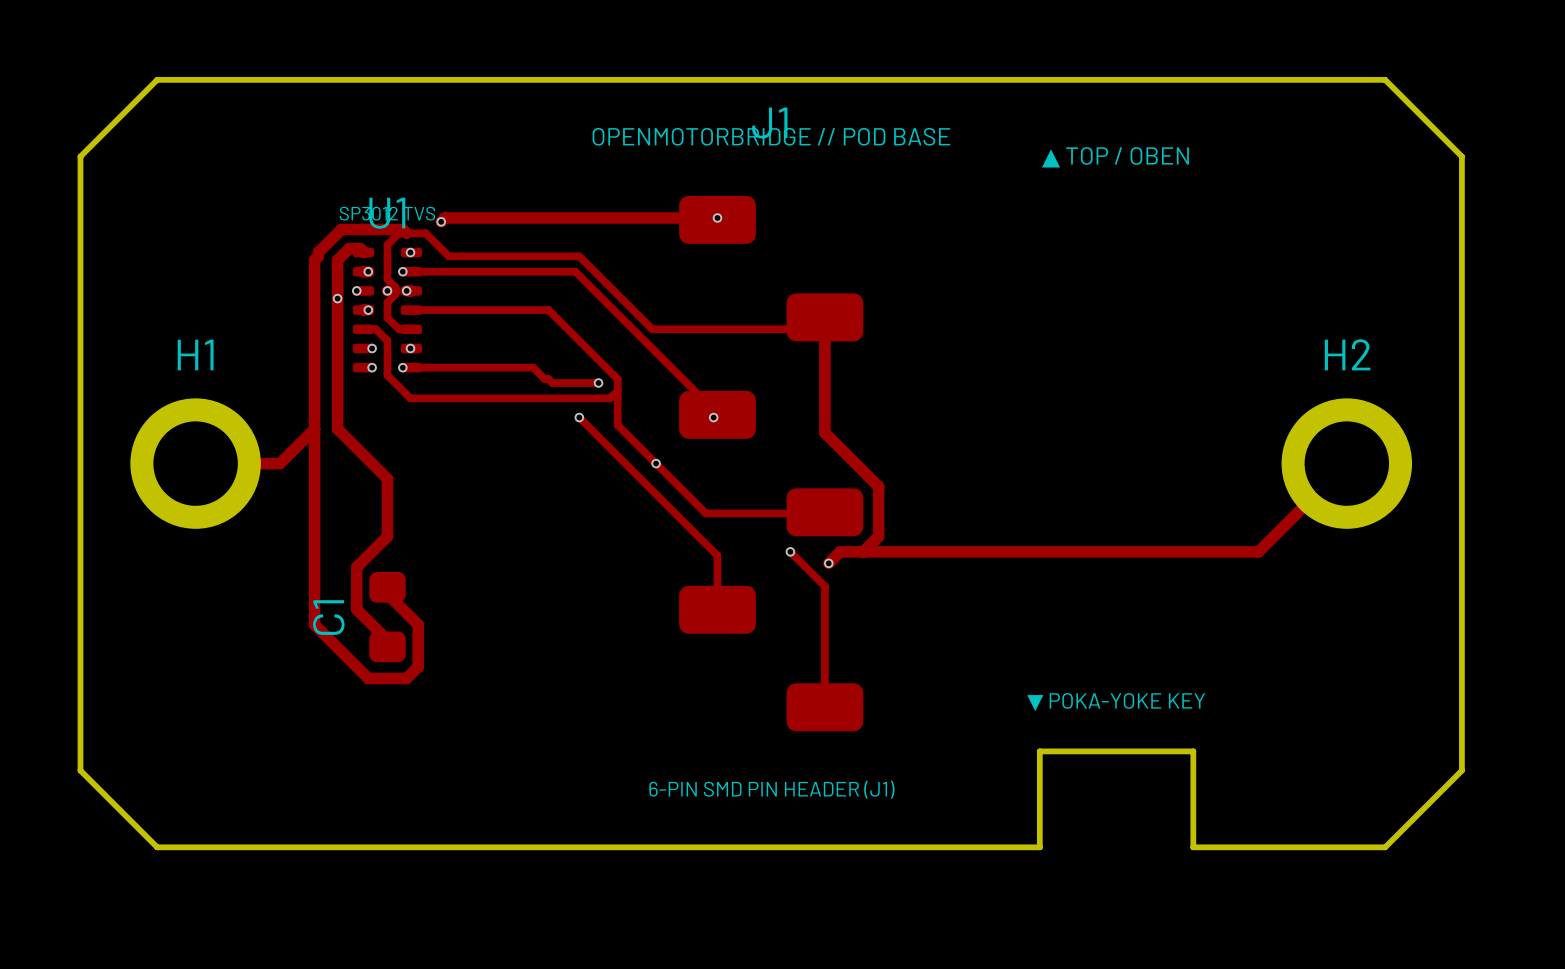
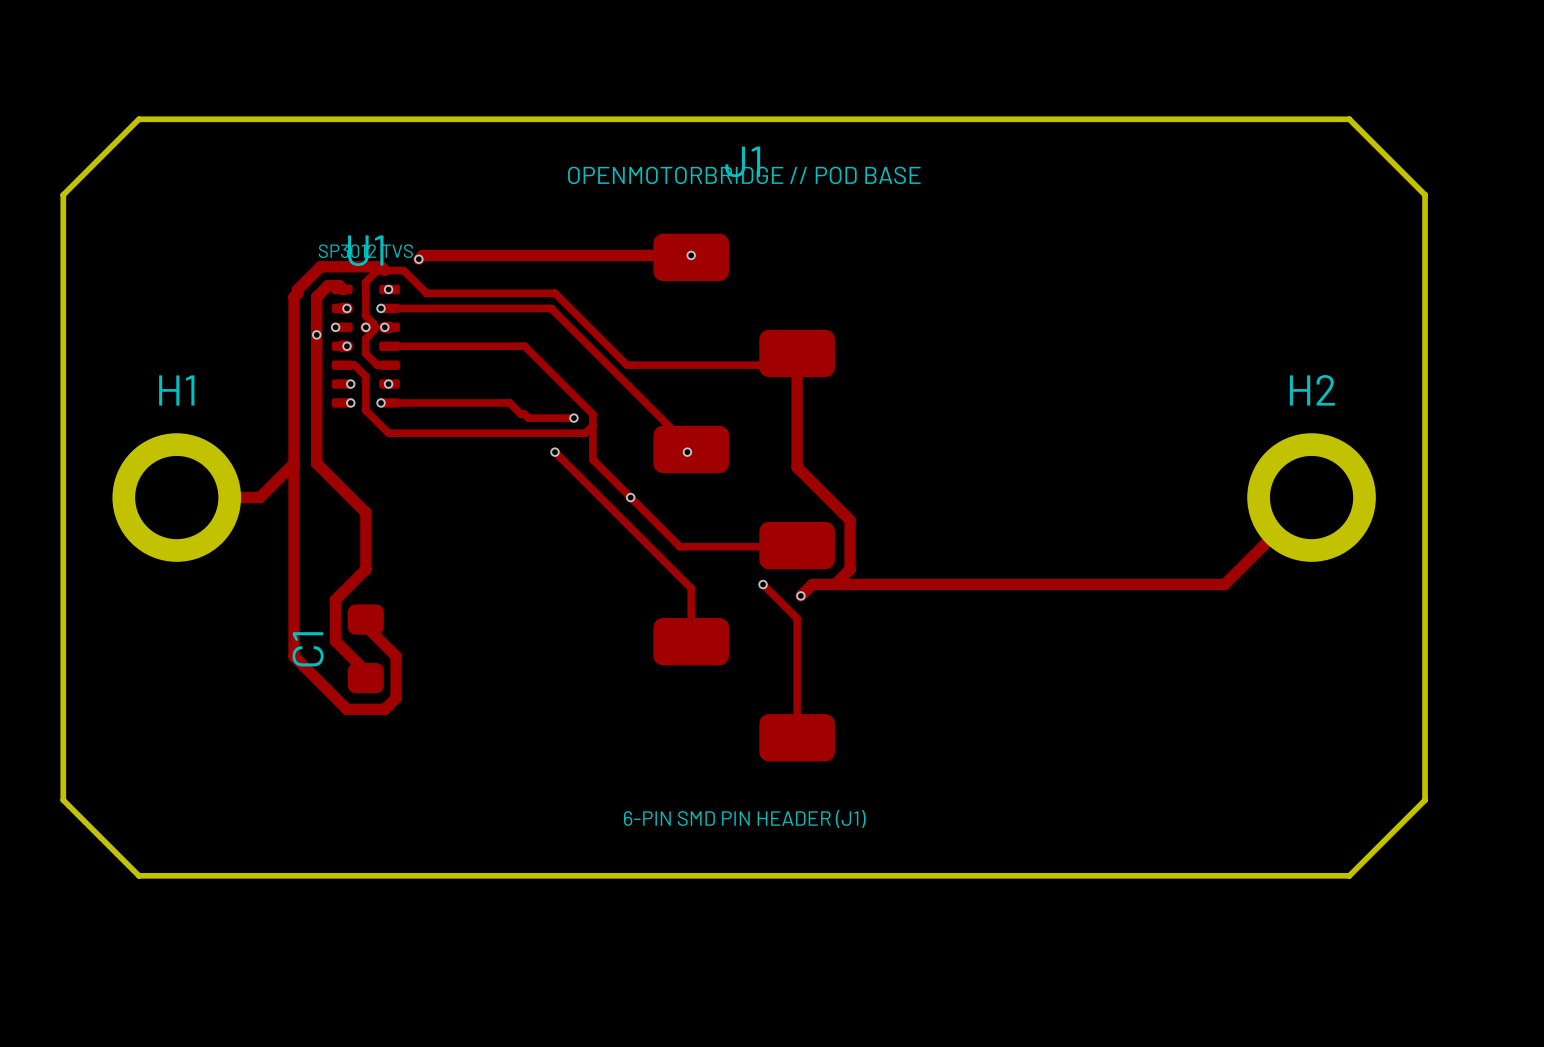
text: ▲ TOP / OBEN (1115, 157) -> none
text: ▼ POKA-YOKE KEY (1116, 702) -> none
board edge: (1039, 847) (1039, 751) (1193, 751) (1193, 847) -> (1008, 875) (1160, 875)

